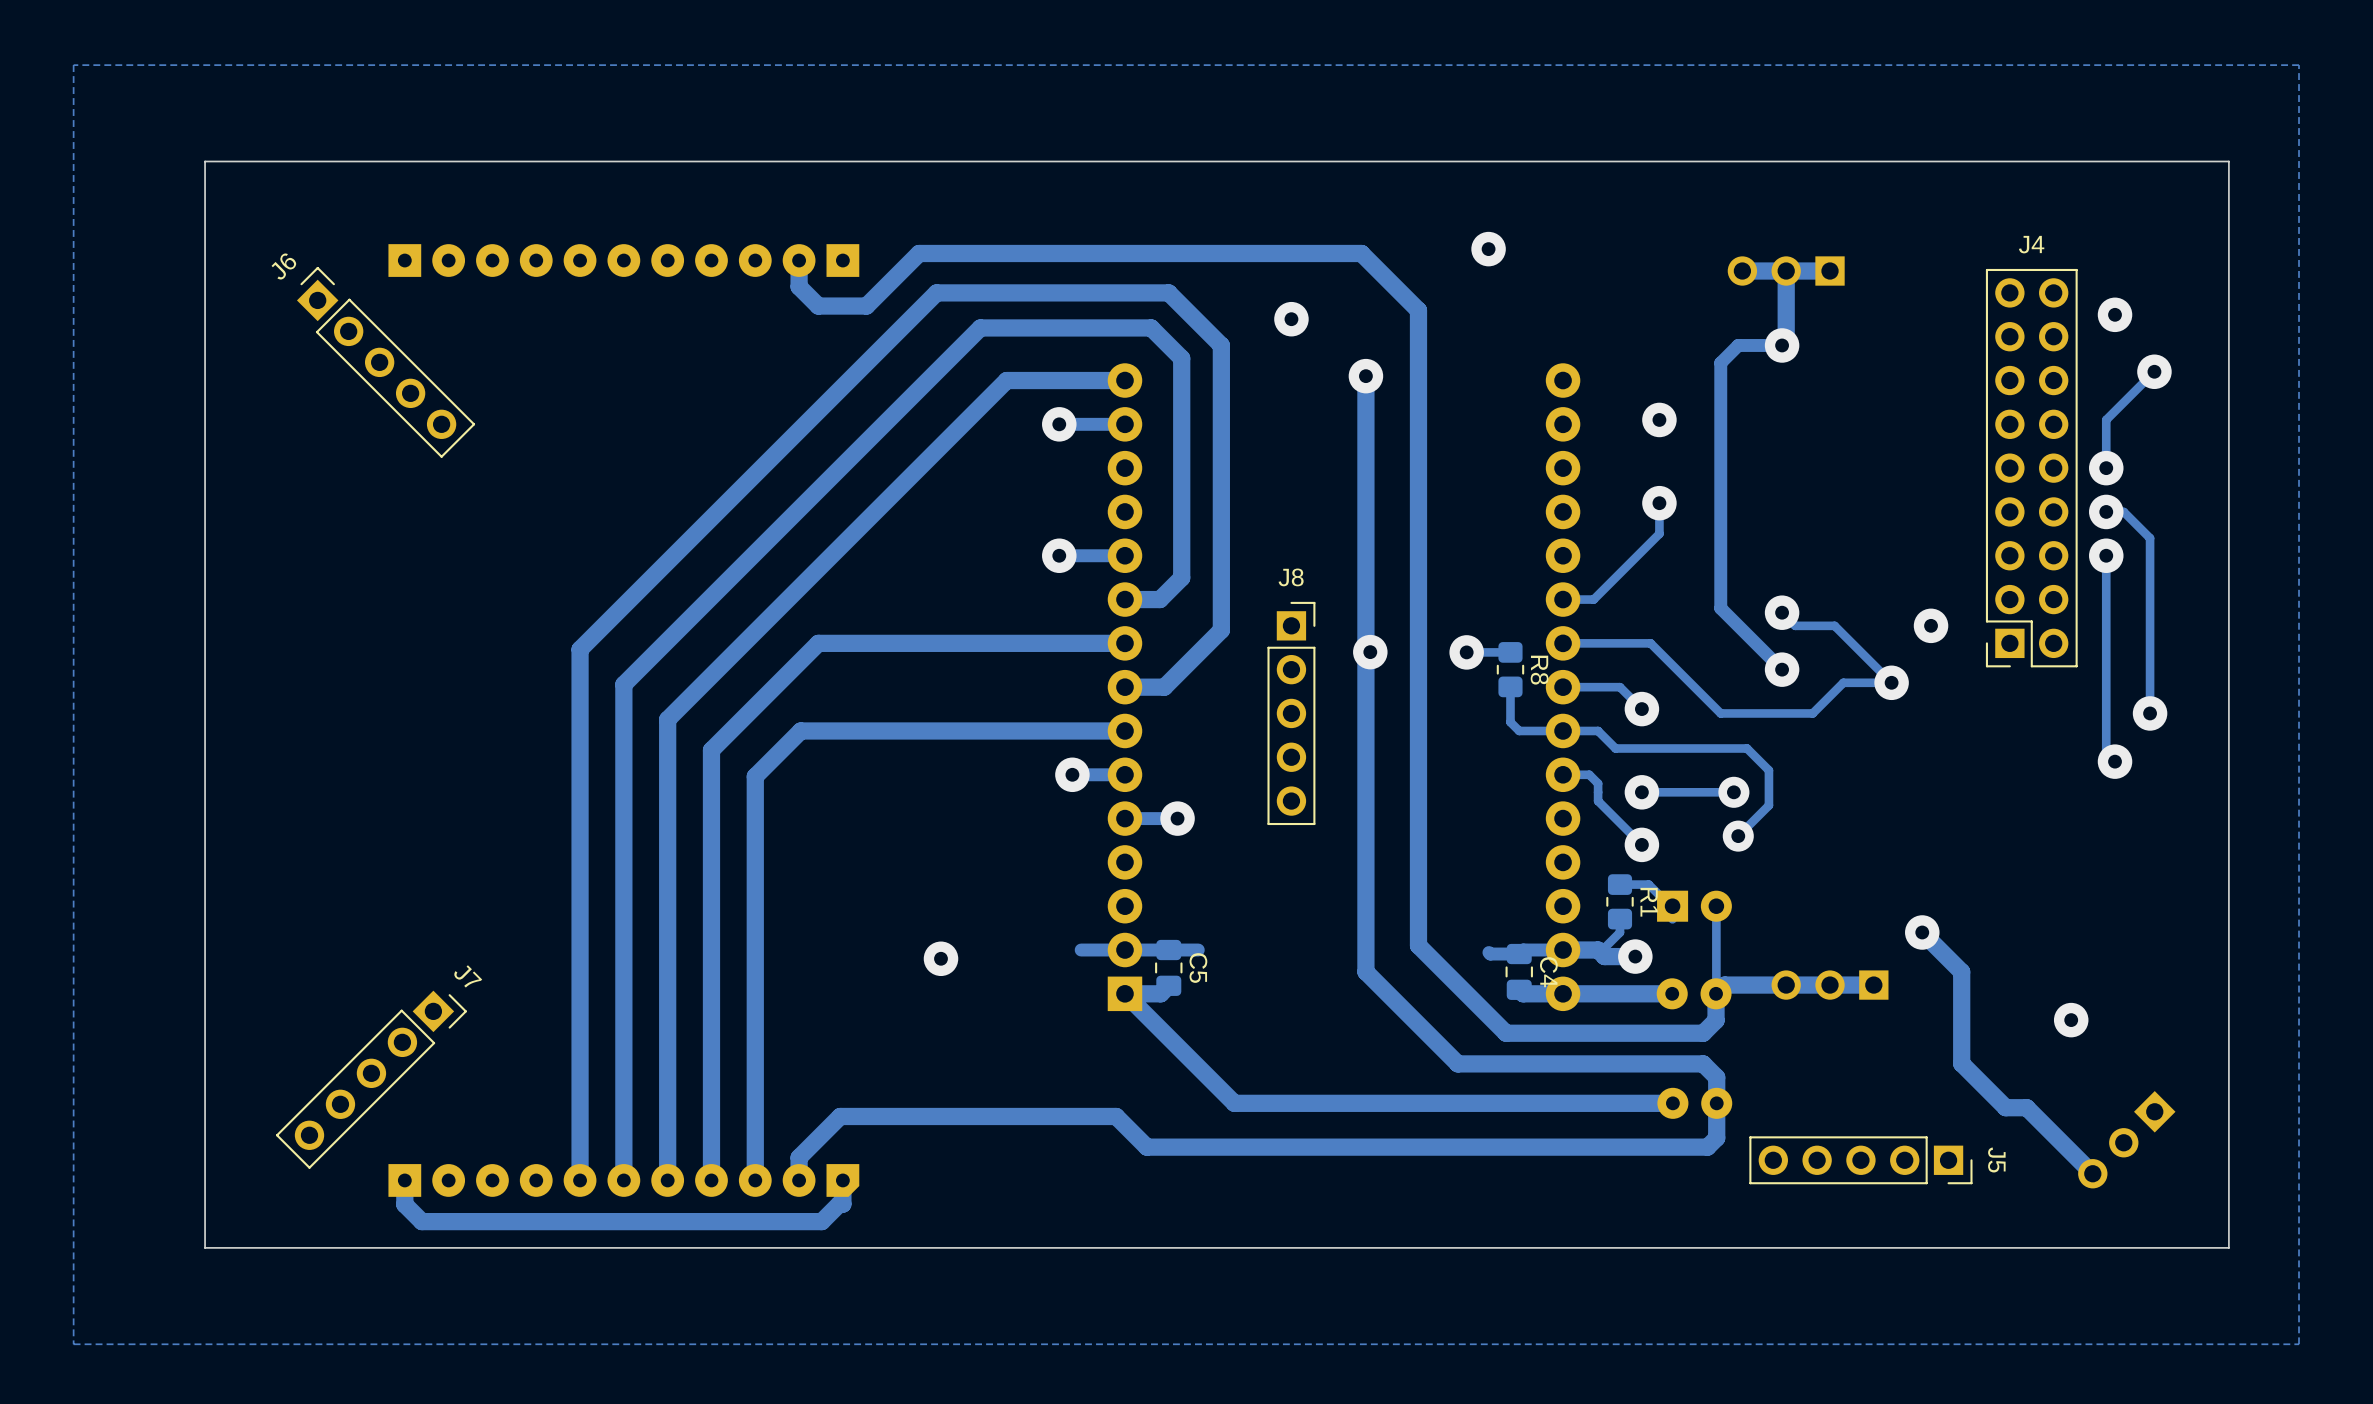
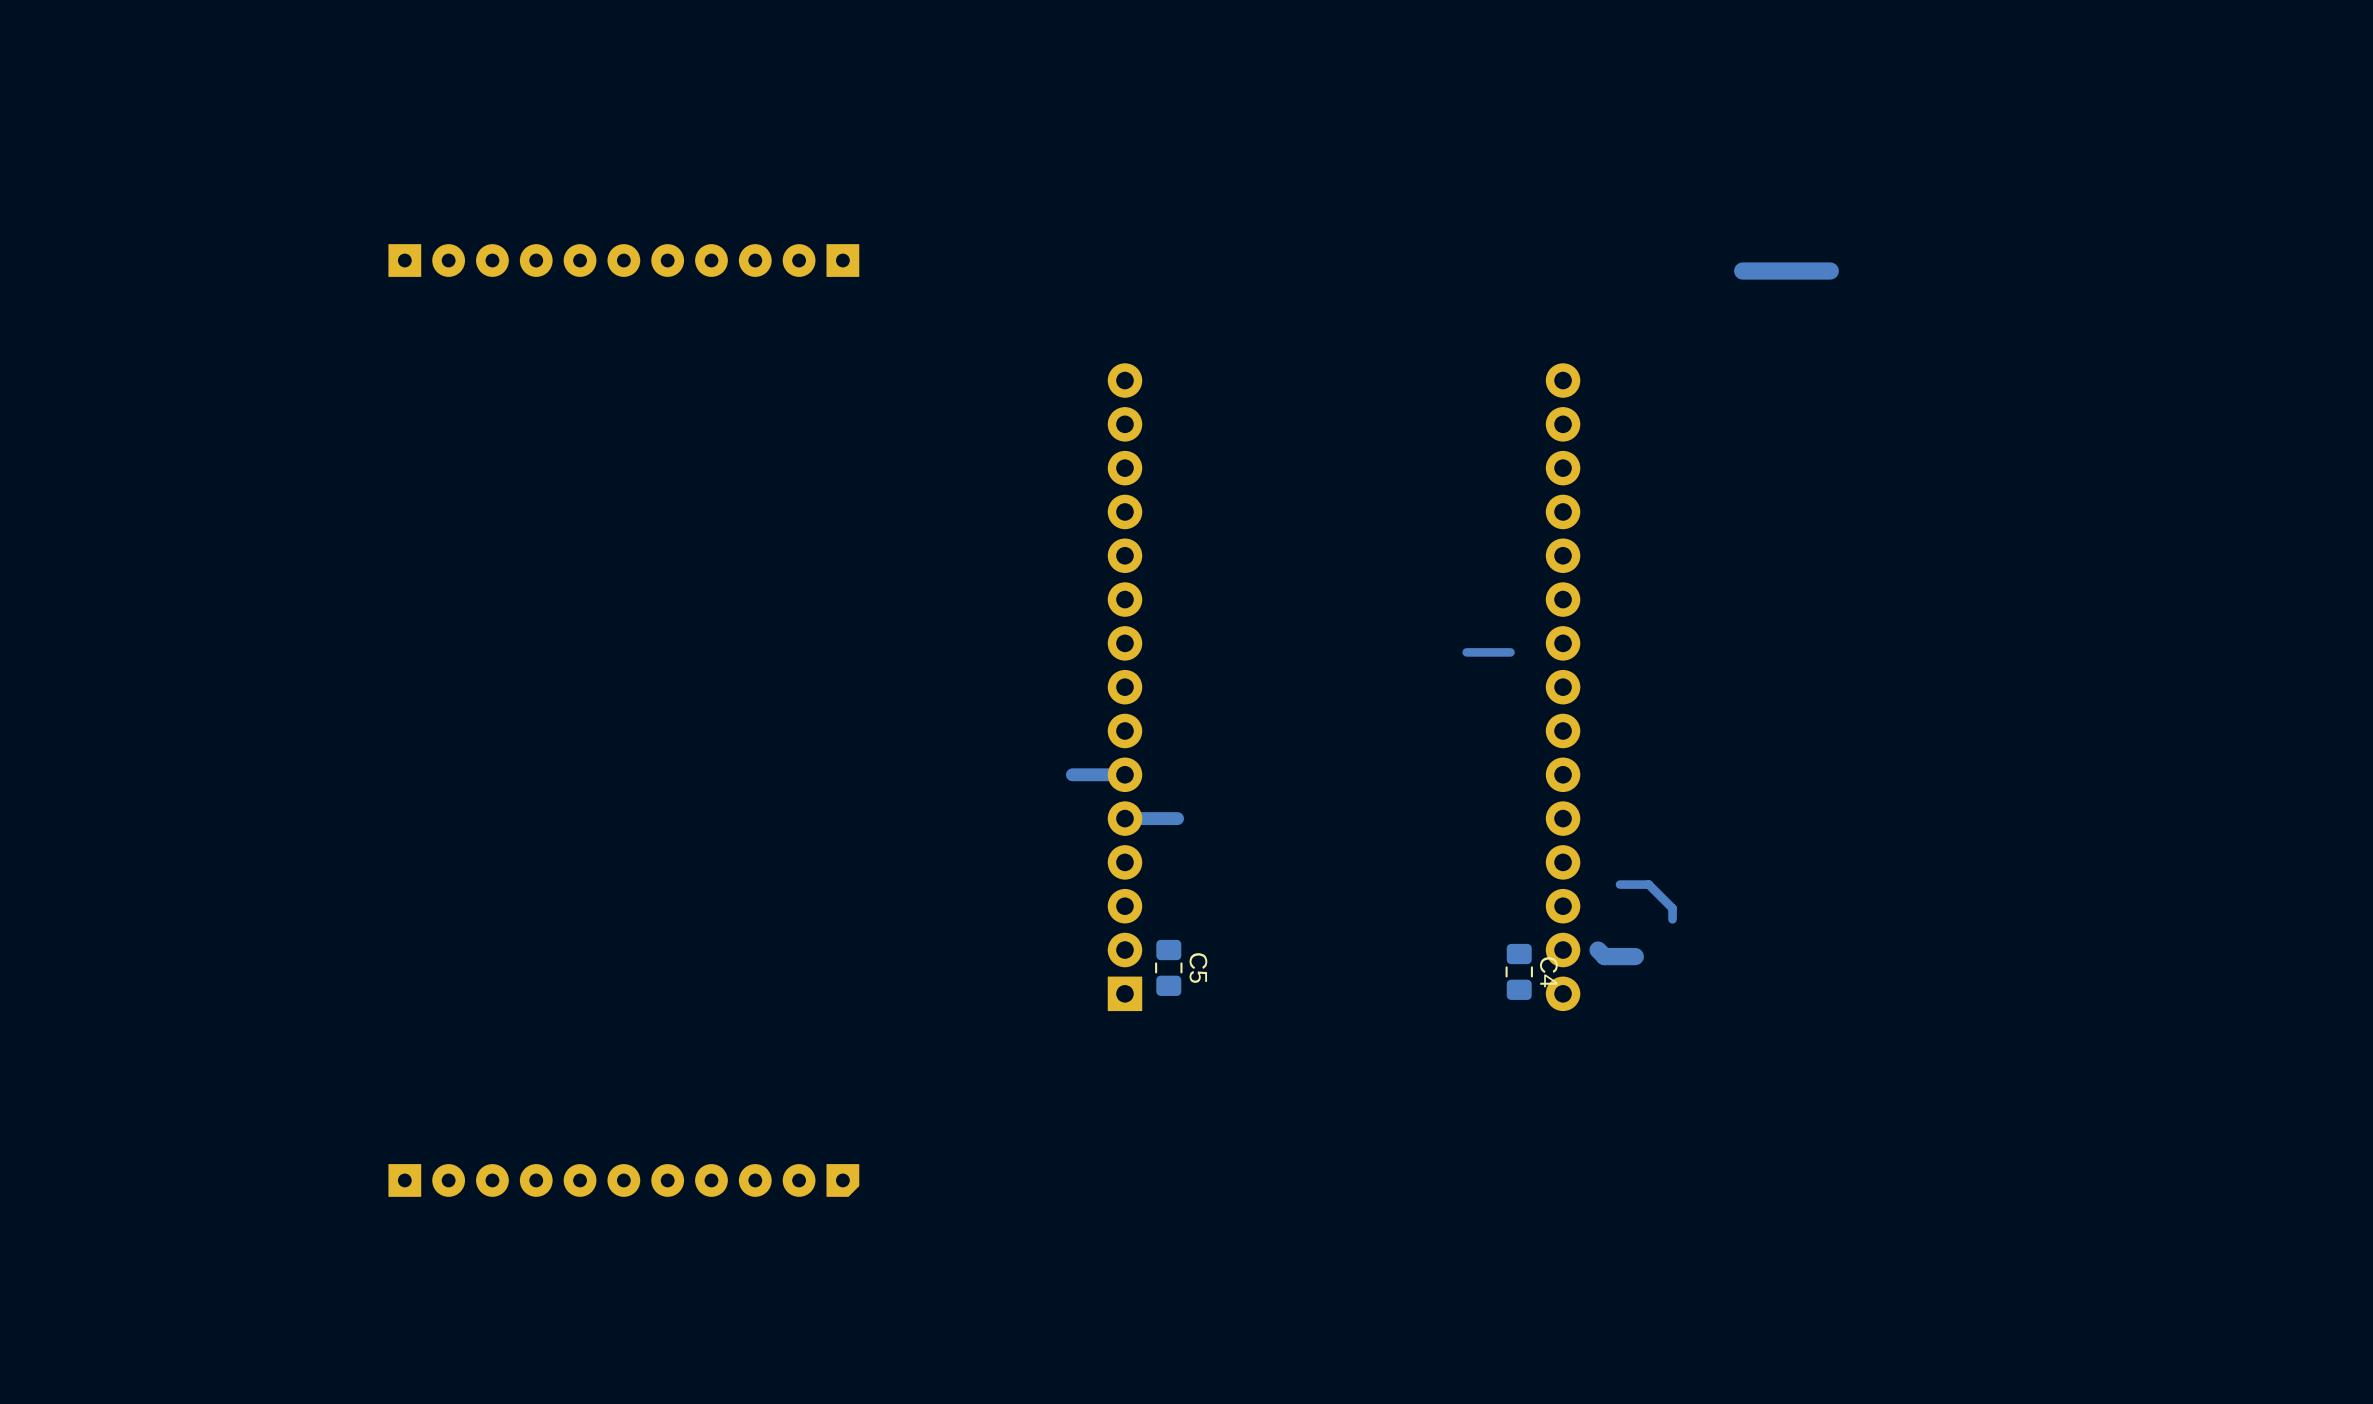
zone outline: (2299, 65) (73, 65) (73, 1344) (2299, 1344) (2299, 65) -> none
board edge: (2228, 161) (205, 161) (205, 1247) (2228, 1247) (2228, 161) -> none
via: (1488, 249) -> none
track: (799, 260) (799, 286) (818, 306) (866, 306) (919, 253) (1361, 253) (1418, 310) (1418, 945) (1506, 1033) (1703, 1033) (1716, 1020) (1716, 993) -> none
track: (1786, 271) (1786, 341) (1782, 345) (1738, 345) (1720, 363) (1720, 608) (1782, 669) -> none
part: (1786, 271) -> none
via: (2115, 314) -> none
via: (1291, 319) -> none
via: (1782, 345) -> none
J6: (386, 362) -> none
track: (2154, 371) (2106, 419) (2106, 468) -> none
via: (2154, 371) -> none
track: (1365, 376) (1365, 971) (1457, 1063) (1703, 1063) (1716, 1077) (1716, 1138) (1707, 1147) (1146, 1147) (1116, 1116) (840, 1116) (799, 1157) (799, 1180) -> none
via: (1365, 376) -> none
track: (1124, 380) (1006, 380) (667, 719) (667, 1180) -> none
via: (1659, 419) -> none
via: (1059, 424) -> none
track: (1124, 424) (1059, 424) -> none
J4: (2031, 468) -> none
via: (2106, 468) -> none
track: (1659, 503) (1659, 533) (1593, 599) (1563, 599) -> none
via: (1659, 503) -> none
track: (2106, 511) (2123, 511) (2150, 538) (2150, 713) -> none
via: (2106, 511) -> none
via: (1059, 555) -> none
track: (1124, 555) (1059, 555) -> none
track: (2106, 555) (2106, 752) (2115, 761) -> none
via: (2106, 555) -> none
track: (1124, 599) (1160, 599) (1181, 577) (1181, 358) (1151, 327) (980, 327) (623, 684) (623, 1180) -> none
track: (1782, 612) (1795, 625) (1834, 625) (1891, 682) (1843, 682) (1812, 713) (1720, 713) (1650, 643) (1563, 643) -> none
via: (1782, 612) -> none
via: (1931, 625) -> none
track: (1124, 643) (818, 643) (711, 750) (711, 1180) -> none
via: (1370, 652) -> none
via: (1466, 652) -> none
R8: (1510, 669) -> none
via: (1782, 669) -> none
via: (1891, 682) -> none
track: (1510, 686) (1510, 722) (1519, 730) (1598, 730) (1615, 748) (1747, 748) (1768, 770) (1768, 805) (1738, 836) -> none
track: (1124, 687) (1164, 687) (1221, 630) (1221, 345) (1168, 292) (936, 292) (580, 649) (580, 1180) -> none
track: (1563, 687) (1620, 687) (1641, 709) -> none
via: (1641, 709) -> none
J8: (1291, 713) -> none
via: (2150, 713) -> none
track: (1124, 730) (800, 730) (755, 776) (755, 1180) -> none
via: (2115, 761) -> none
via: (1072, 774) -> none
track: (1563, 774) (1589, 774) (1598, 783) (1598, 801) (1641, 844) -> none
via: (1641, 792) -> none
track: (1733, 792) (1641, 792) -> none
via: (1733, 792) -> none
via: (1177, 818) -> none
via: (1738, 836) -> none
via: (1641, 844) -> none
R1: (1620, 901) -> none
part: (1694, 906) -> none
track: (1620, 919) (1620, 932) (1602, 950) (1523, 950) (1519, 954) (1488, 952) -> none
track: (1716, 919) (1716, 993) -> none
track: (1922, 932) (1961, 971) (1961, 1063) (2005, 1107) (2026, 1107) (2092, 1173) -> none
via: (1922, 932) -> none
track: (1198, 950) (1081, 950) -> none
via: (1635, 956) -> none
via: (941, 958) -> none
track: (1168, 985) (1160, 993) (1124, 993) (1234, 1103) (1672, 1103) -> none
part: (1830, 985) -> none
track: (1873, 985) (1724, 985) (1716, 993) -> none
track: (1519, 989) (1523, 993) (1672, 993) -> none
part: (1694, 993) -> none
via: (2071, 1020) -> none
J7: (371, 1079) -> none
part: (1694, 1103) -> none
part: (2126, 1139) -> none
J5: (1860, 1160) -> none
track: (842, 1180) (842, 1204) (839, 1204) (821, 1221) (421, 1221) (404, 1204) (404, 1180) -> none

